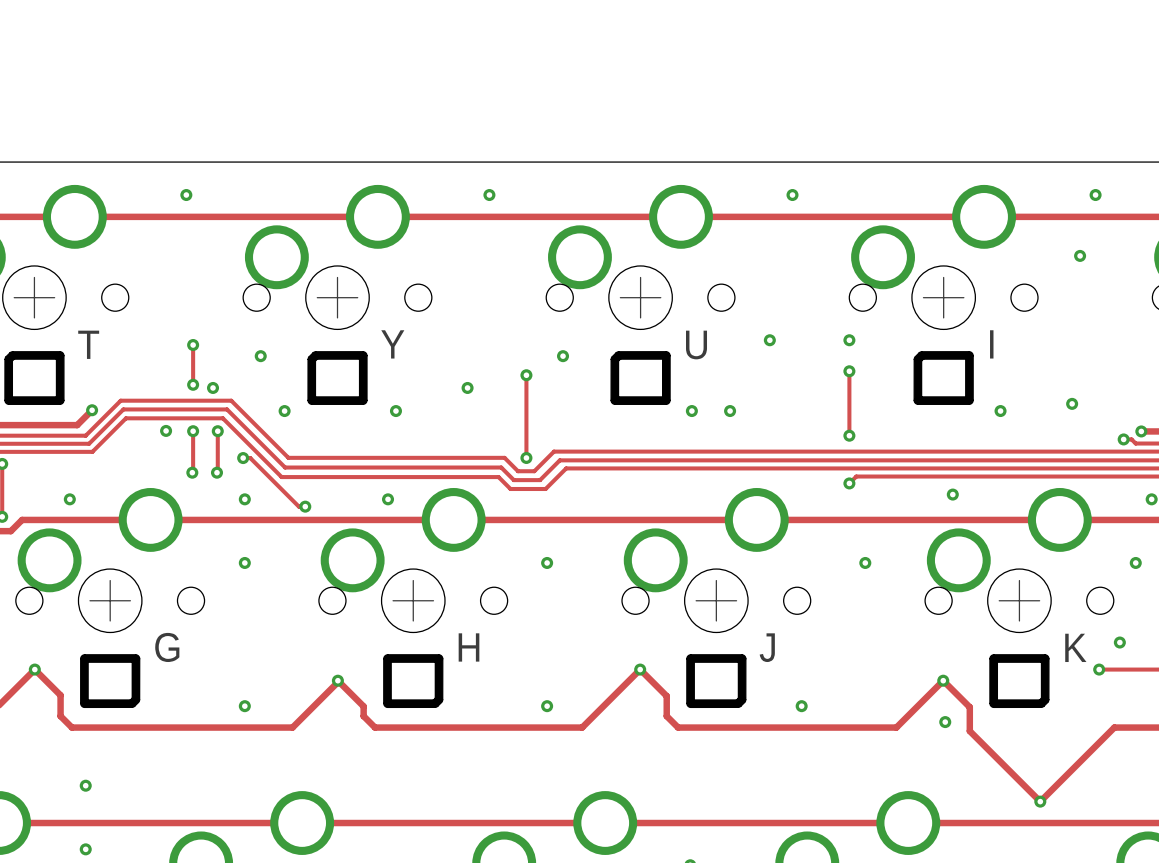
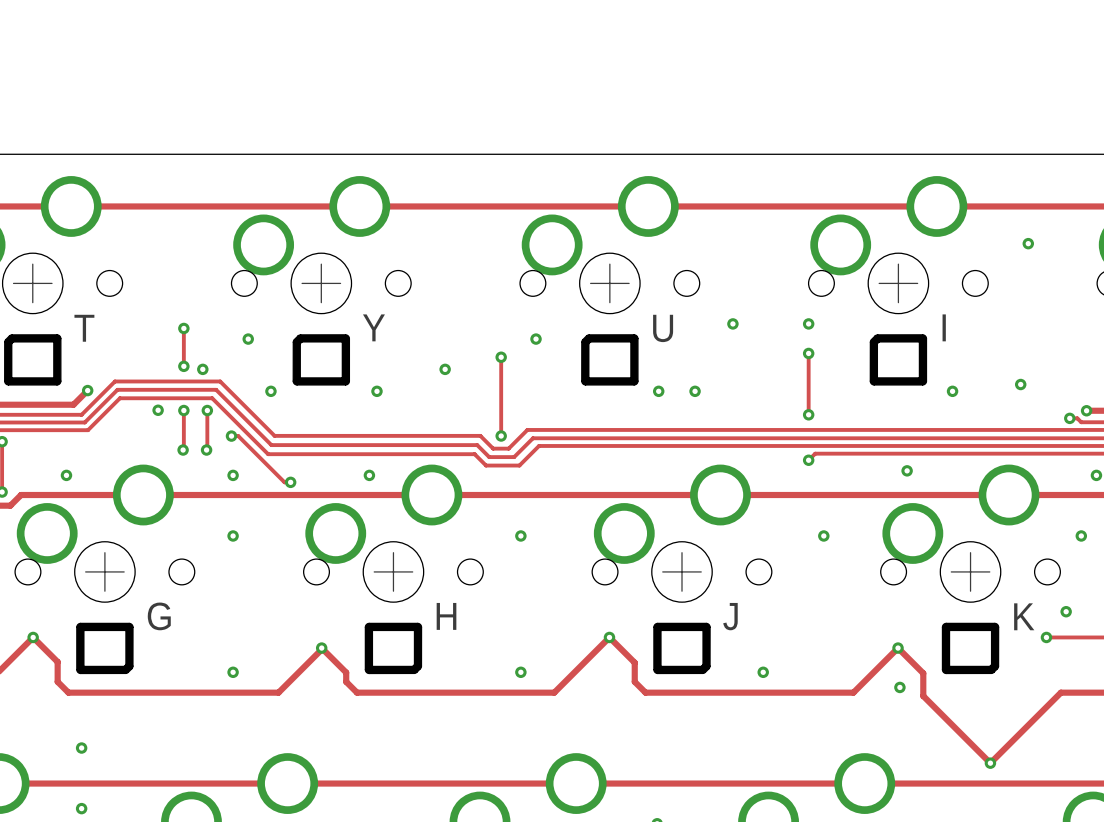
via: (186, 195) -> none
via: (489, 195) -> none
via: (792, 195) -> none
via: (1095, 195) -> none

